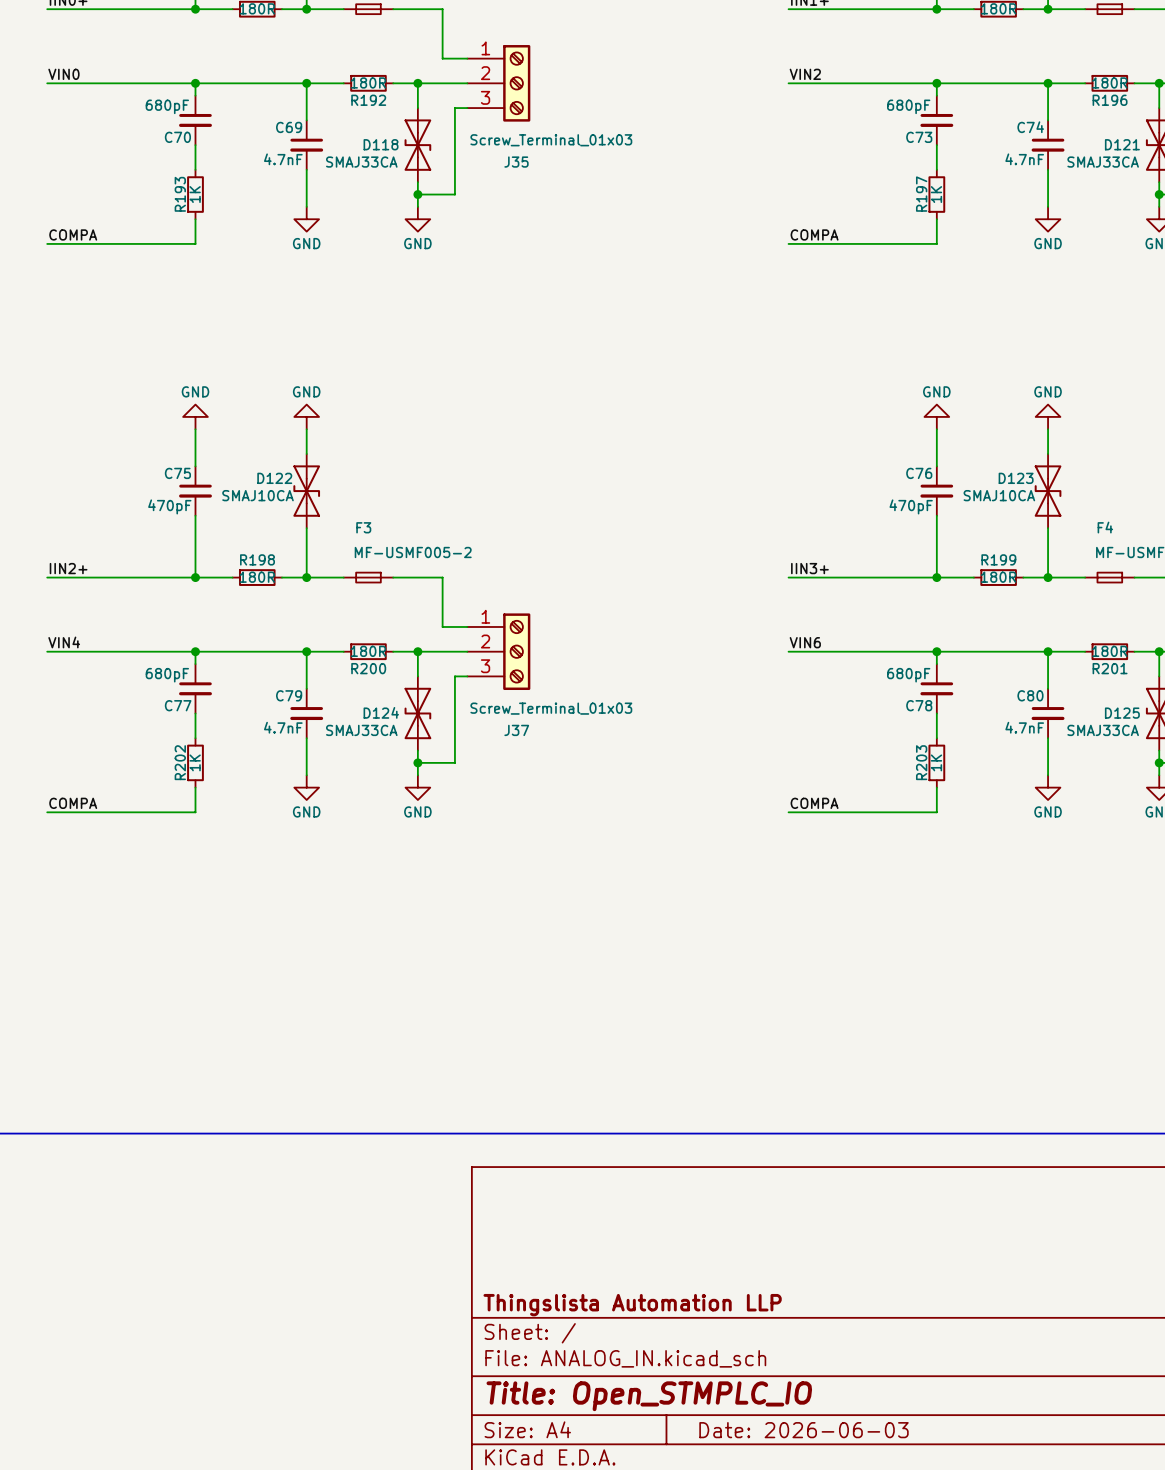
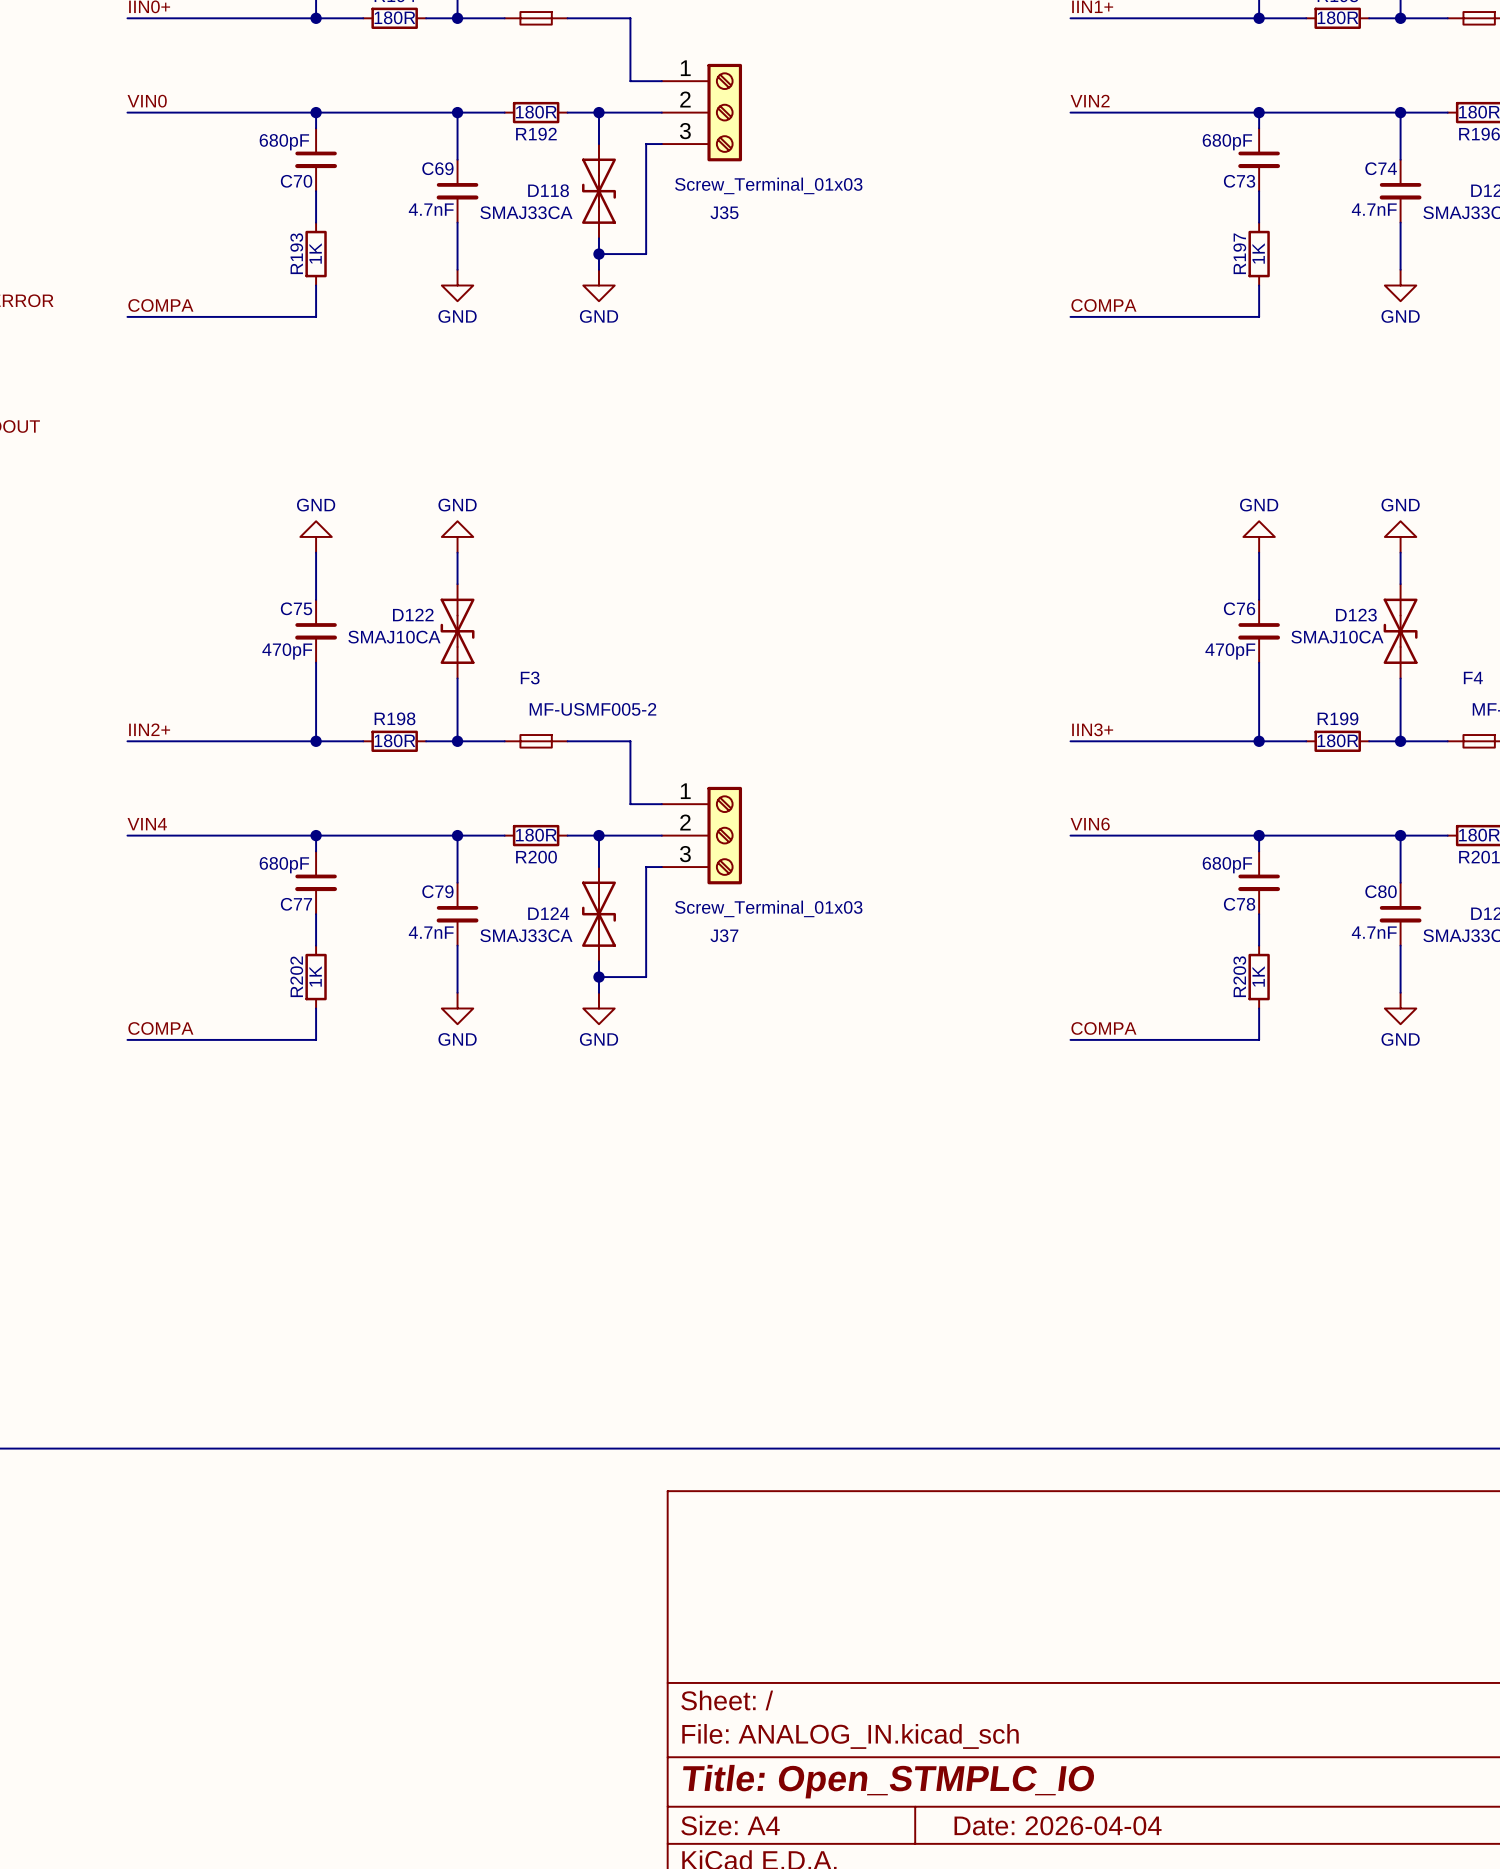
title block: Thingslista Automation LLP (632, 1305) -> none
title block: Date: 2026-06-03 (804, 1430) -> Date: 2026-04-04 (1058, 1825)

